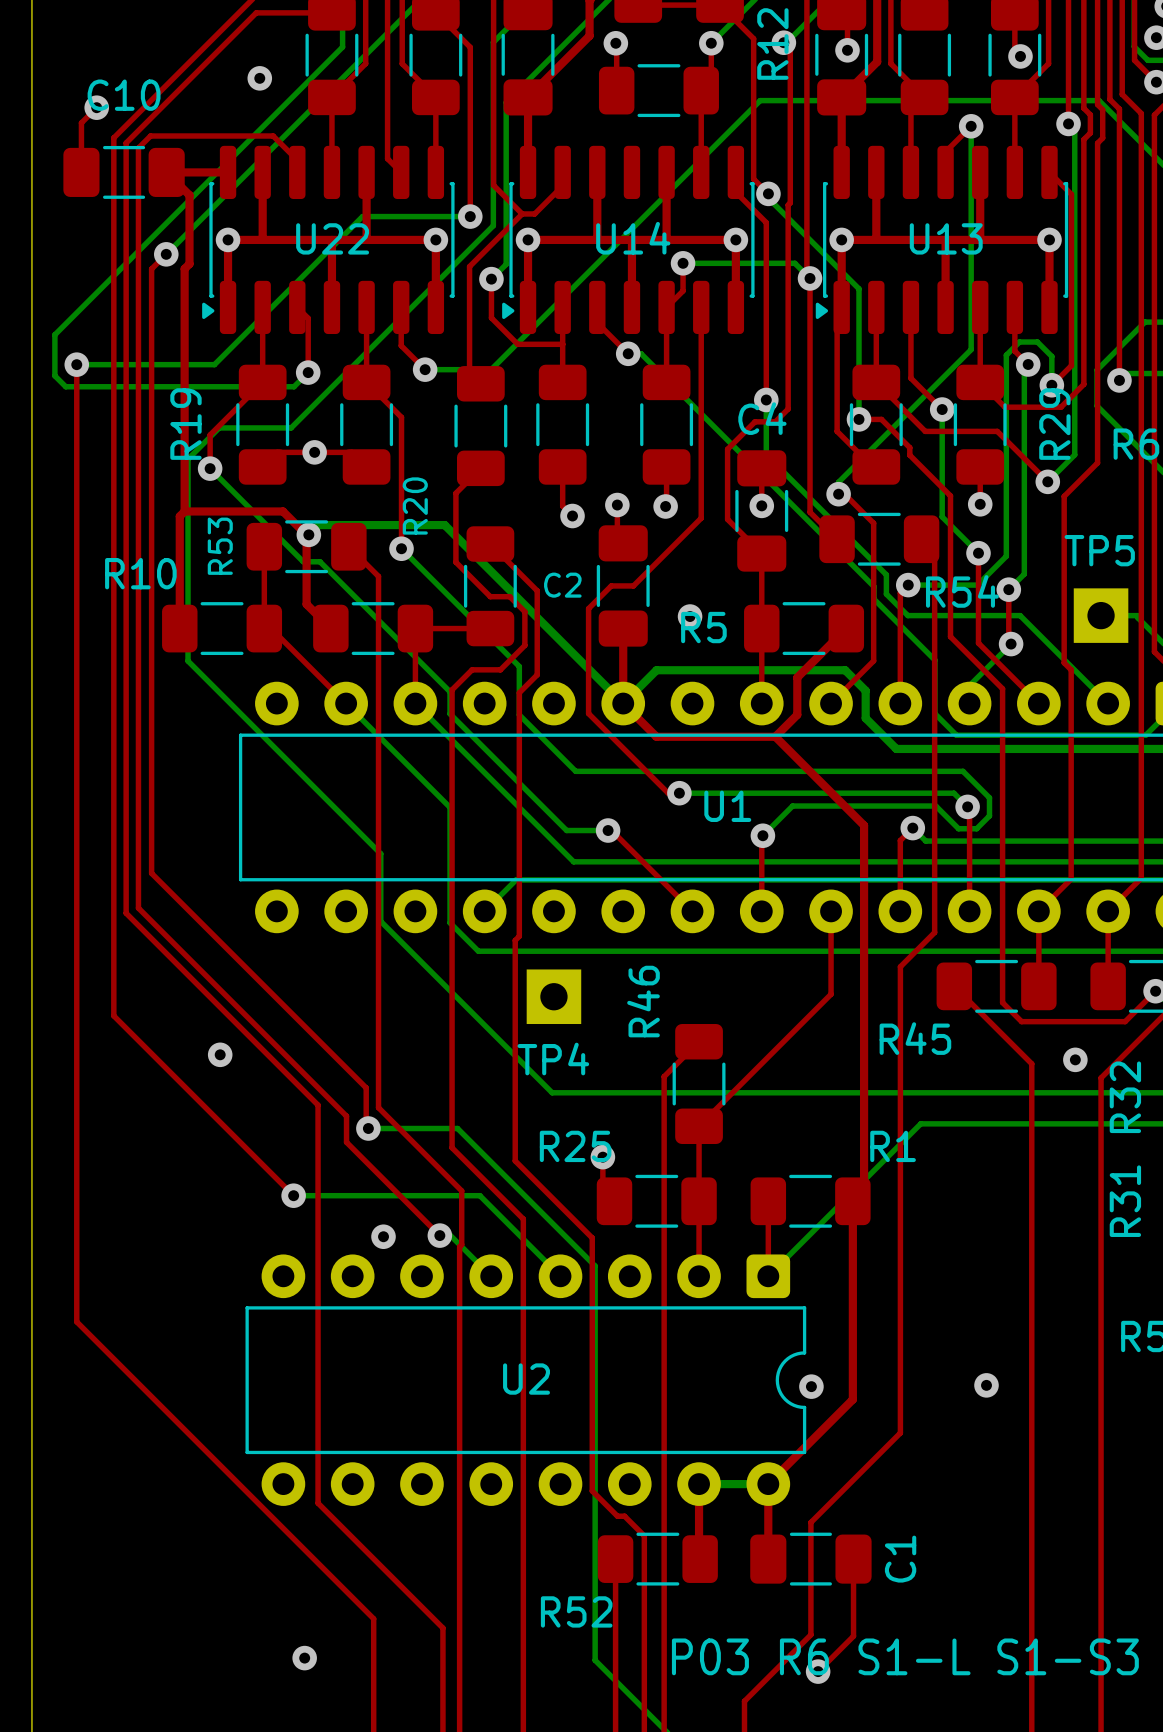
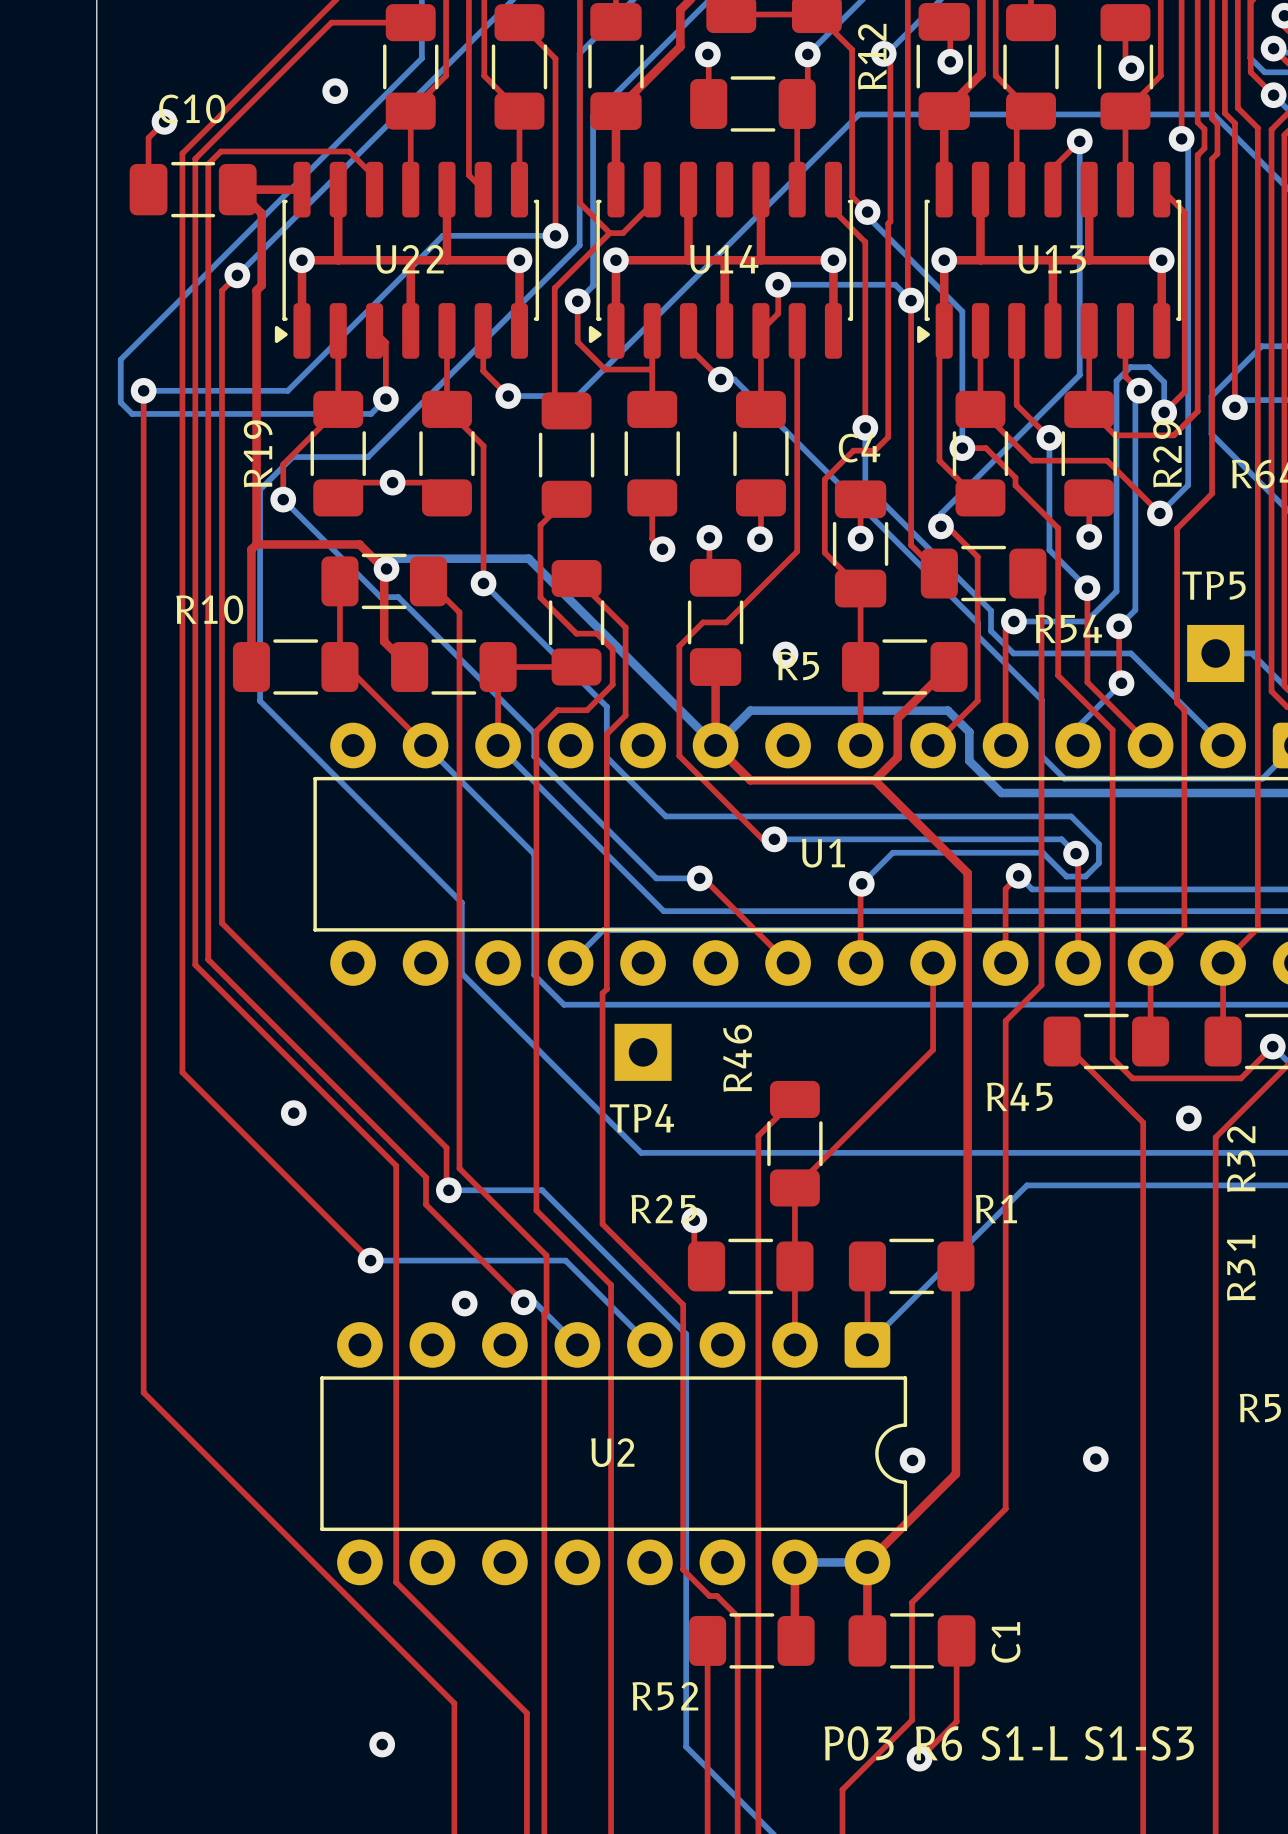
R20 name: R20 (415, 505) -> none
R53 name: R53 (220, 546) -> none
C2 name: C2 (562, 585) -> none

